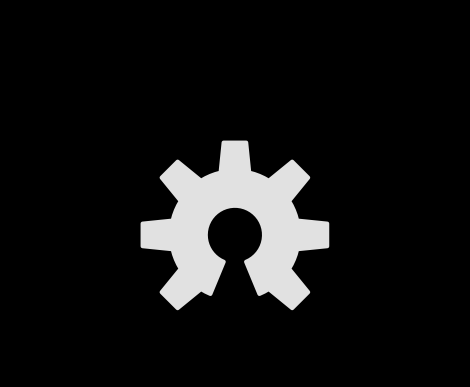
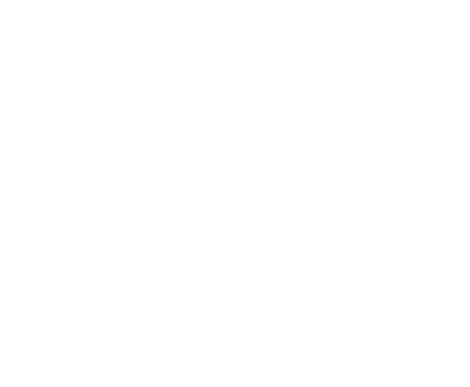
drawing: [140, 140, 330, 311] -> none

